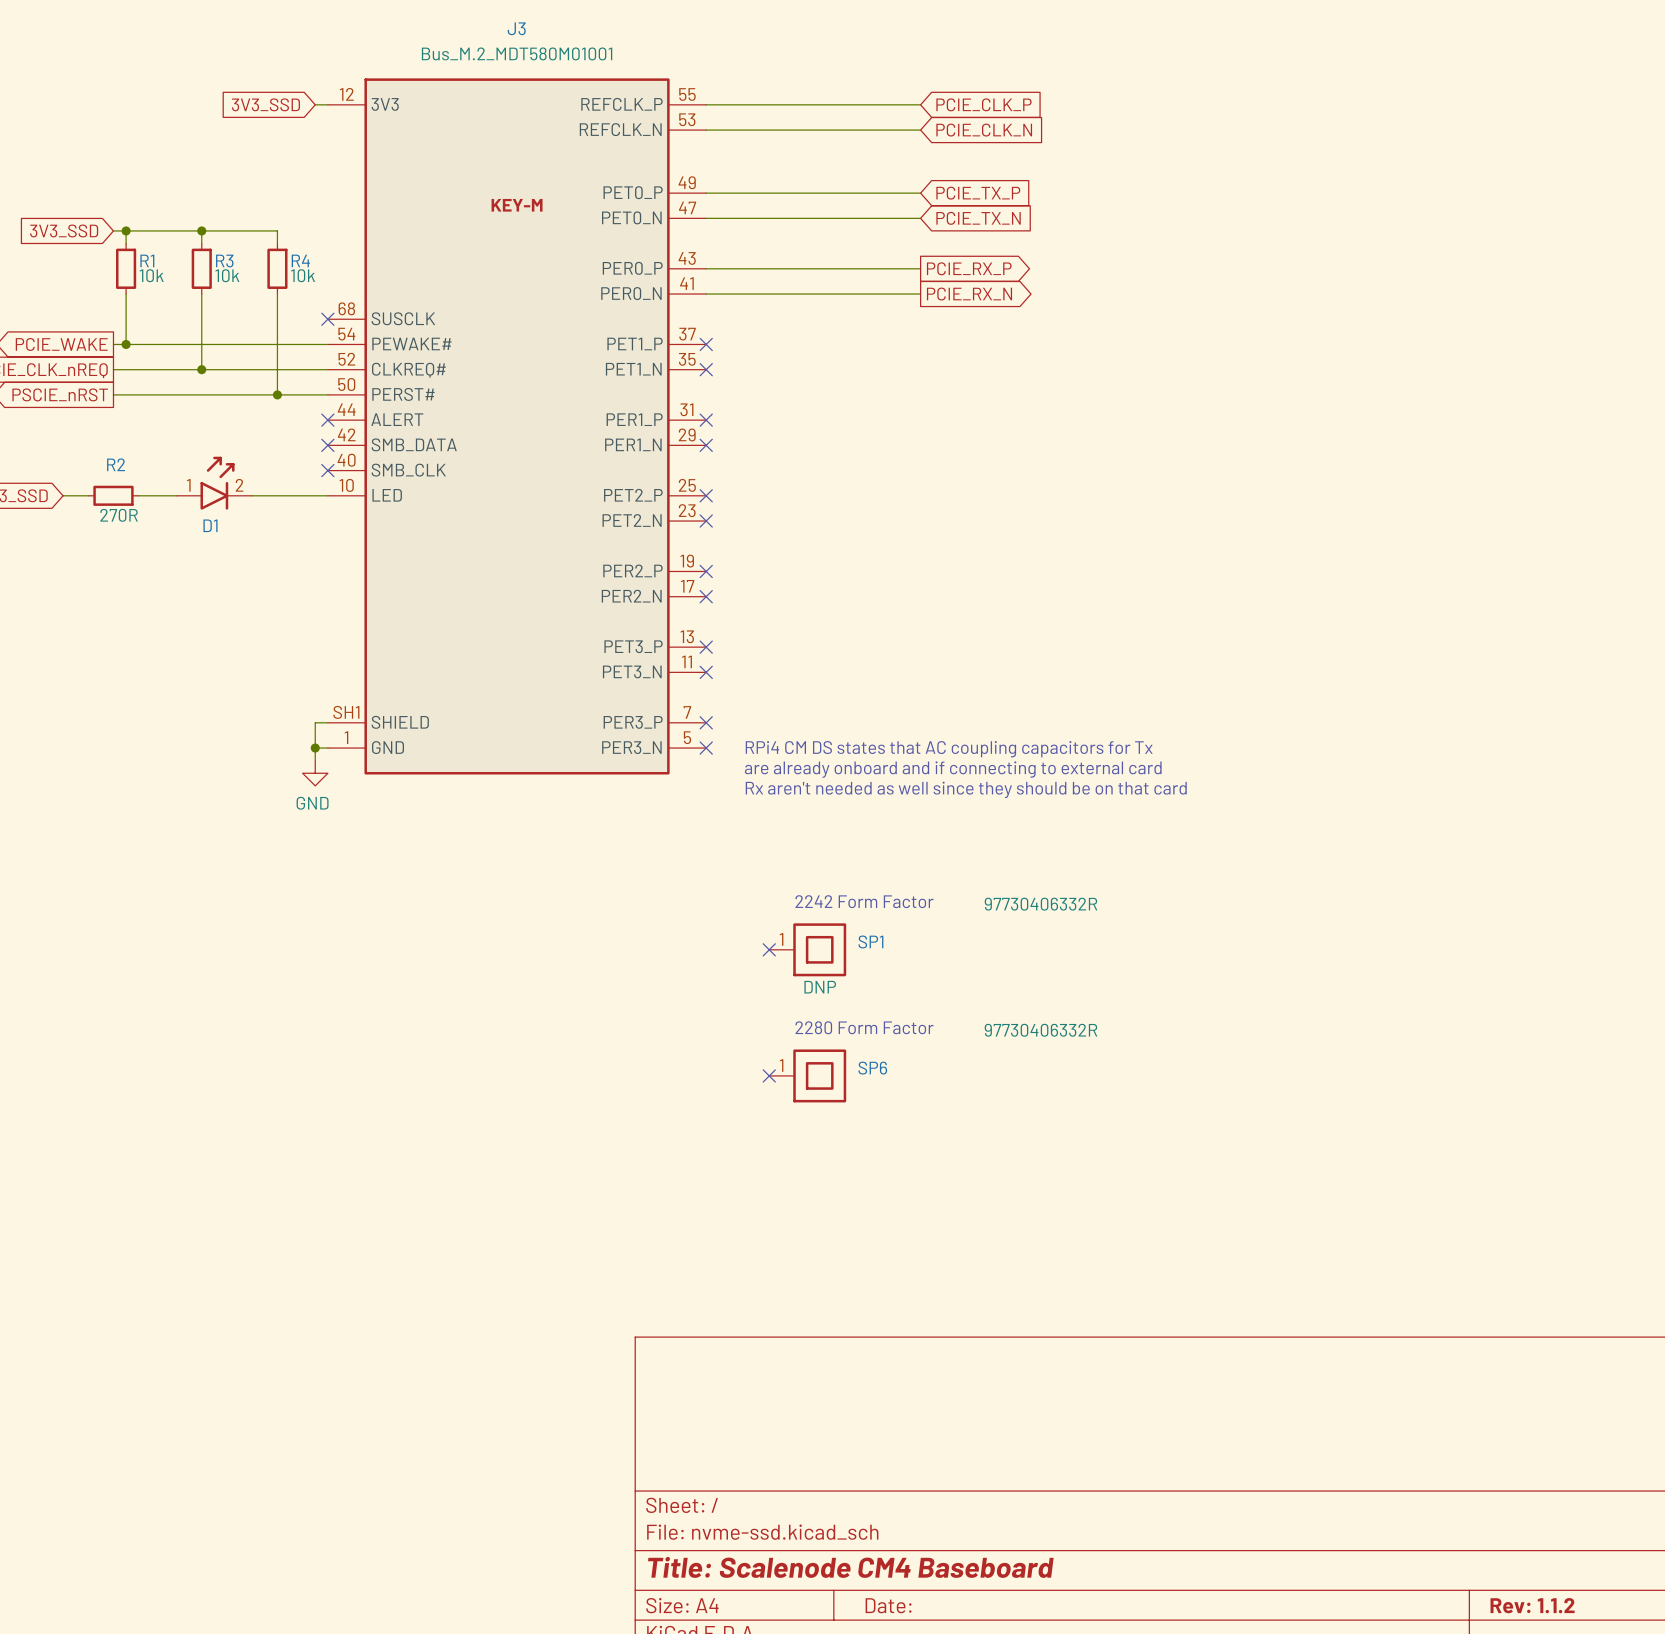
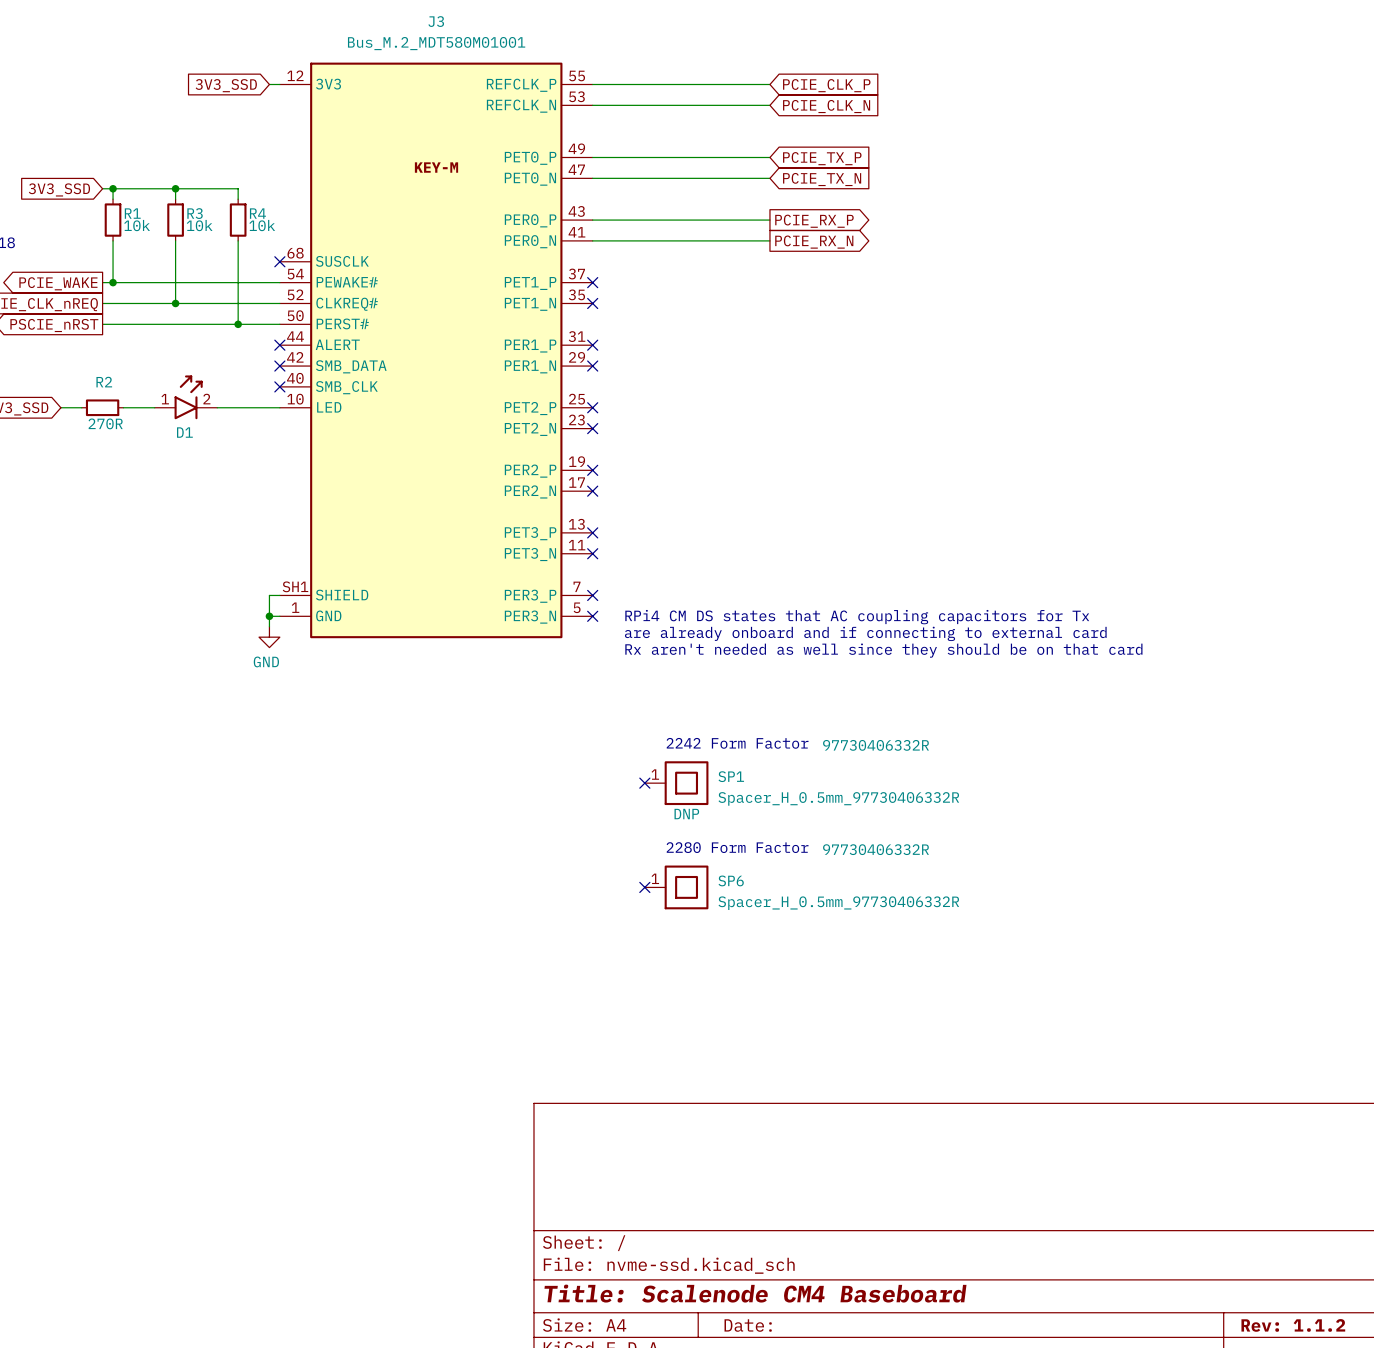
SP1 value: none -> Spacer_H_0.5mm_97730406332R (838, 798)
SP6 value: none -> Spacer_H_0.5mm_97730406332R (838, 903)

